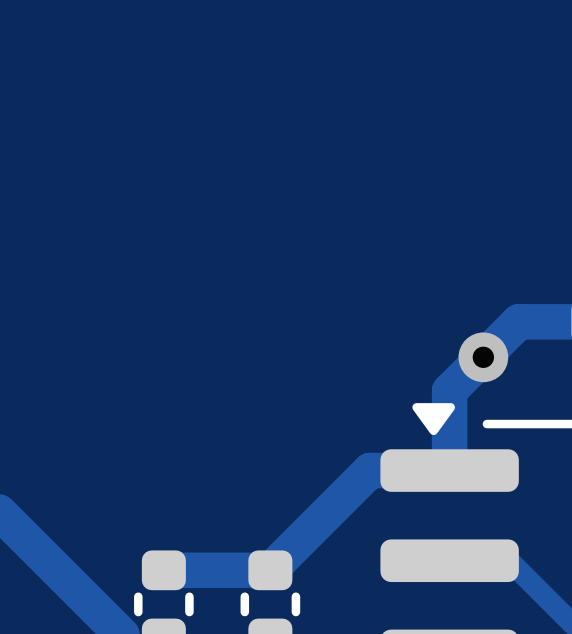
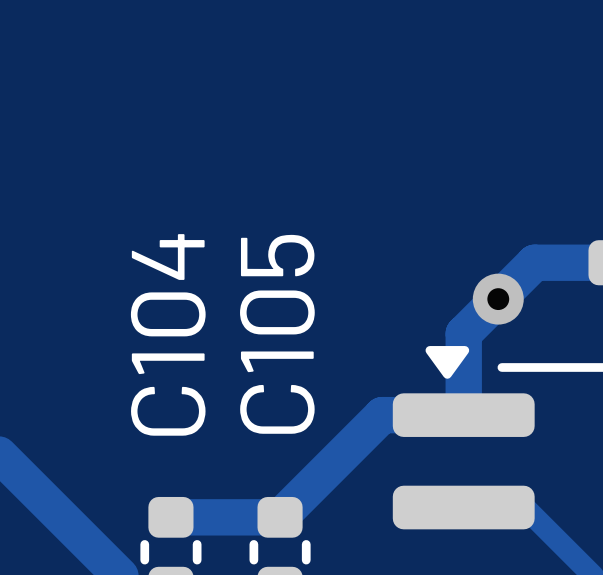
C105 name: none -> C105 (277, 334)
C104 name: none -> C104 (168, 334)

